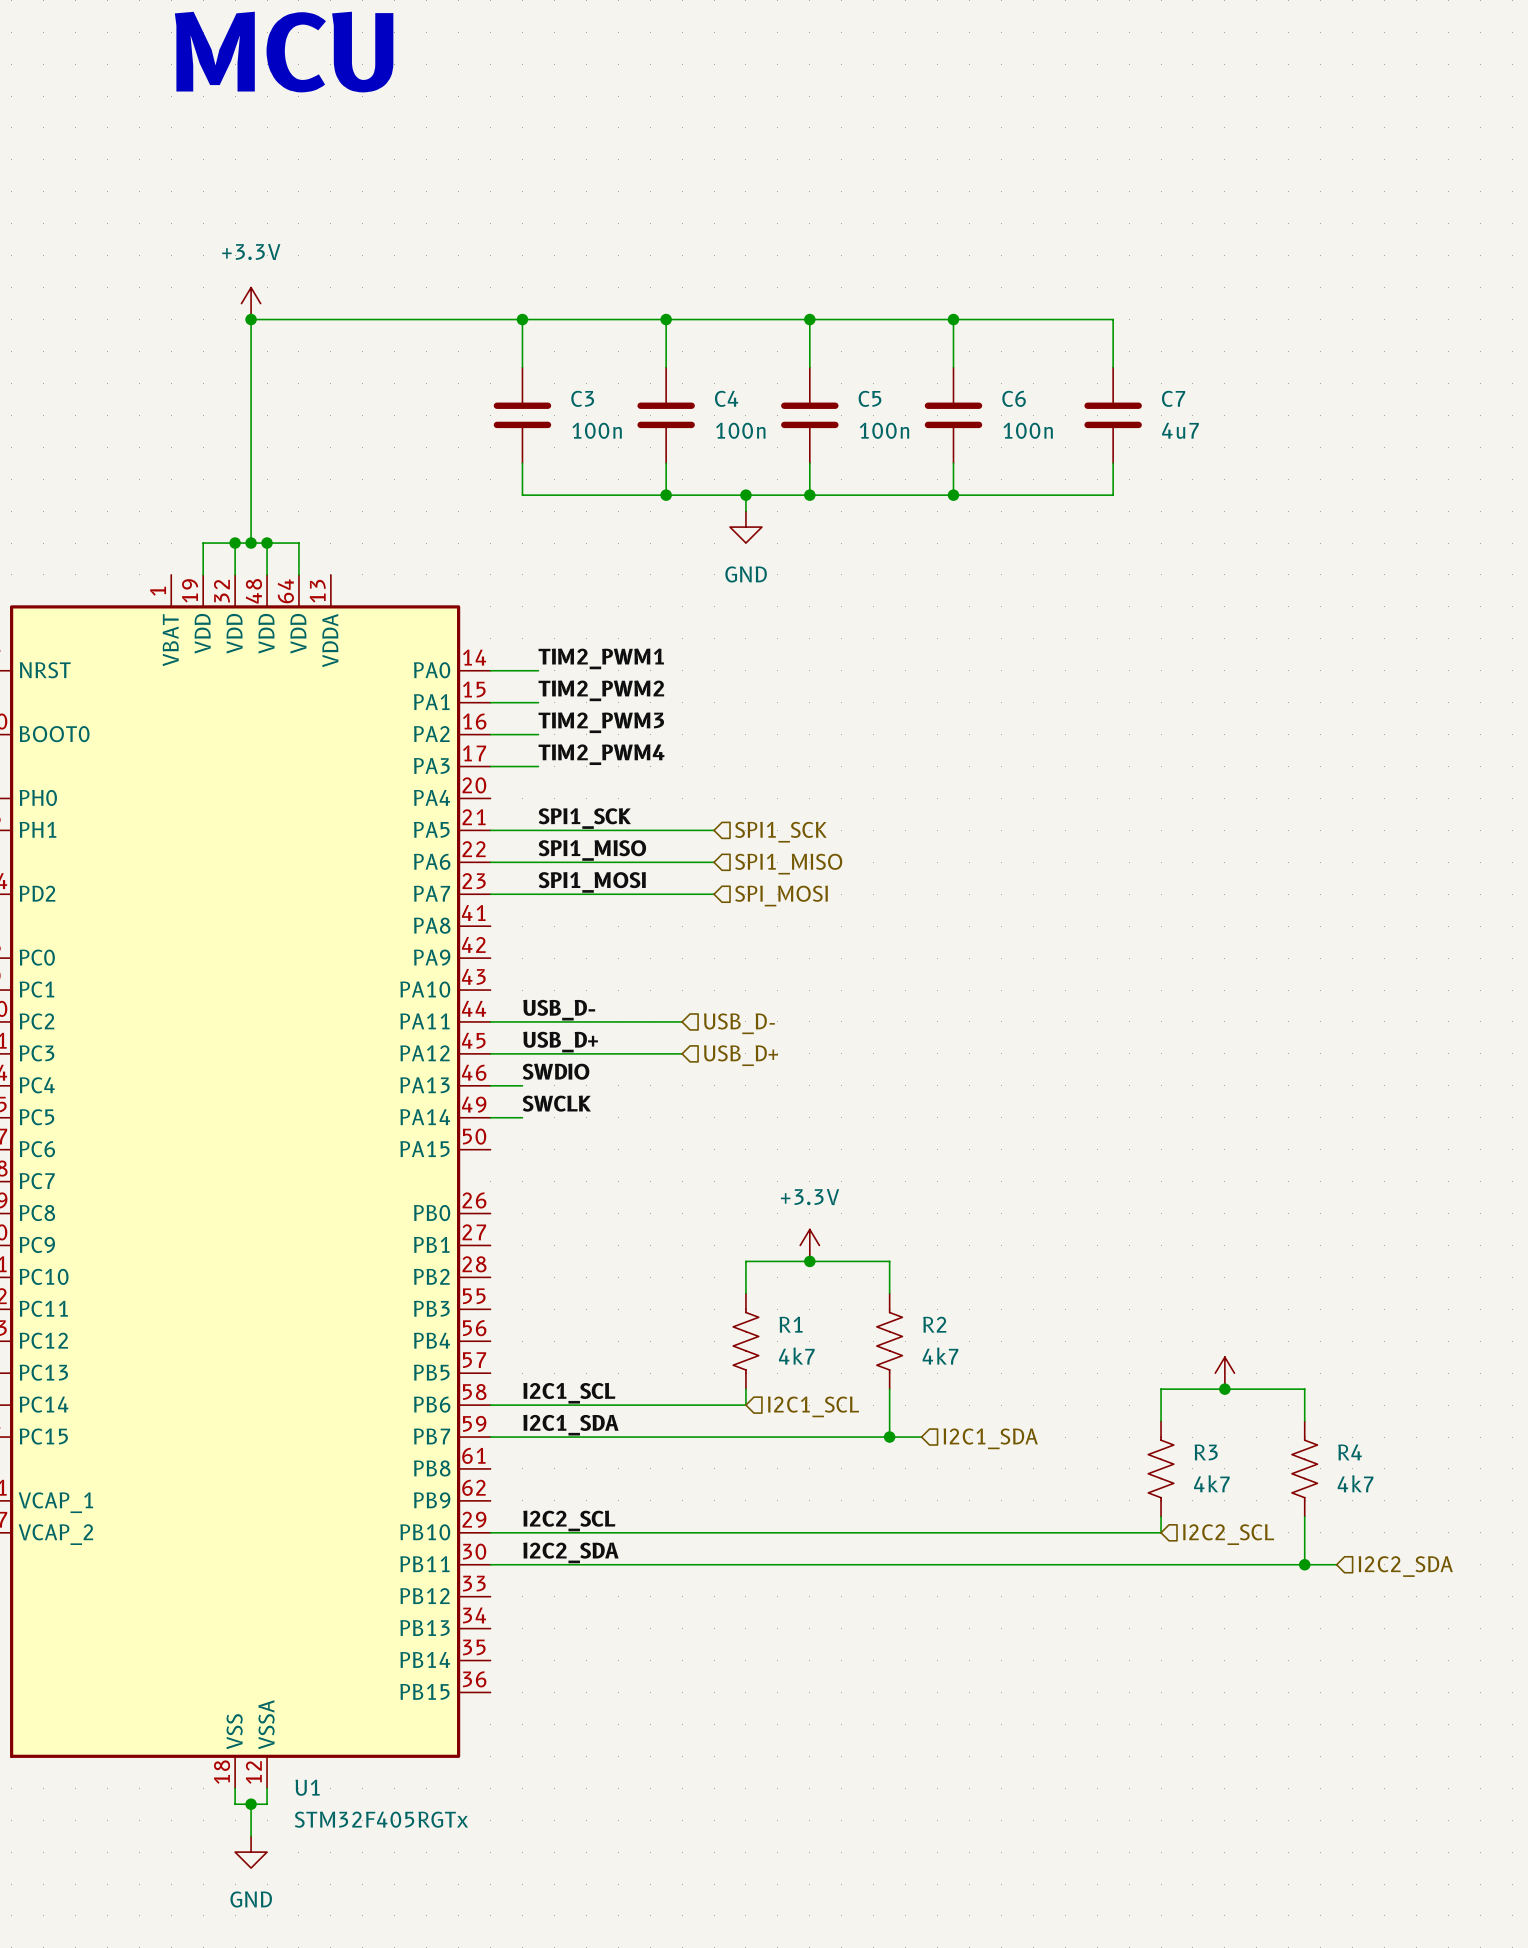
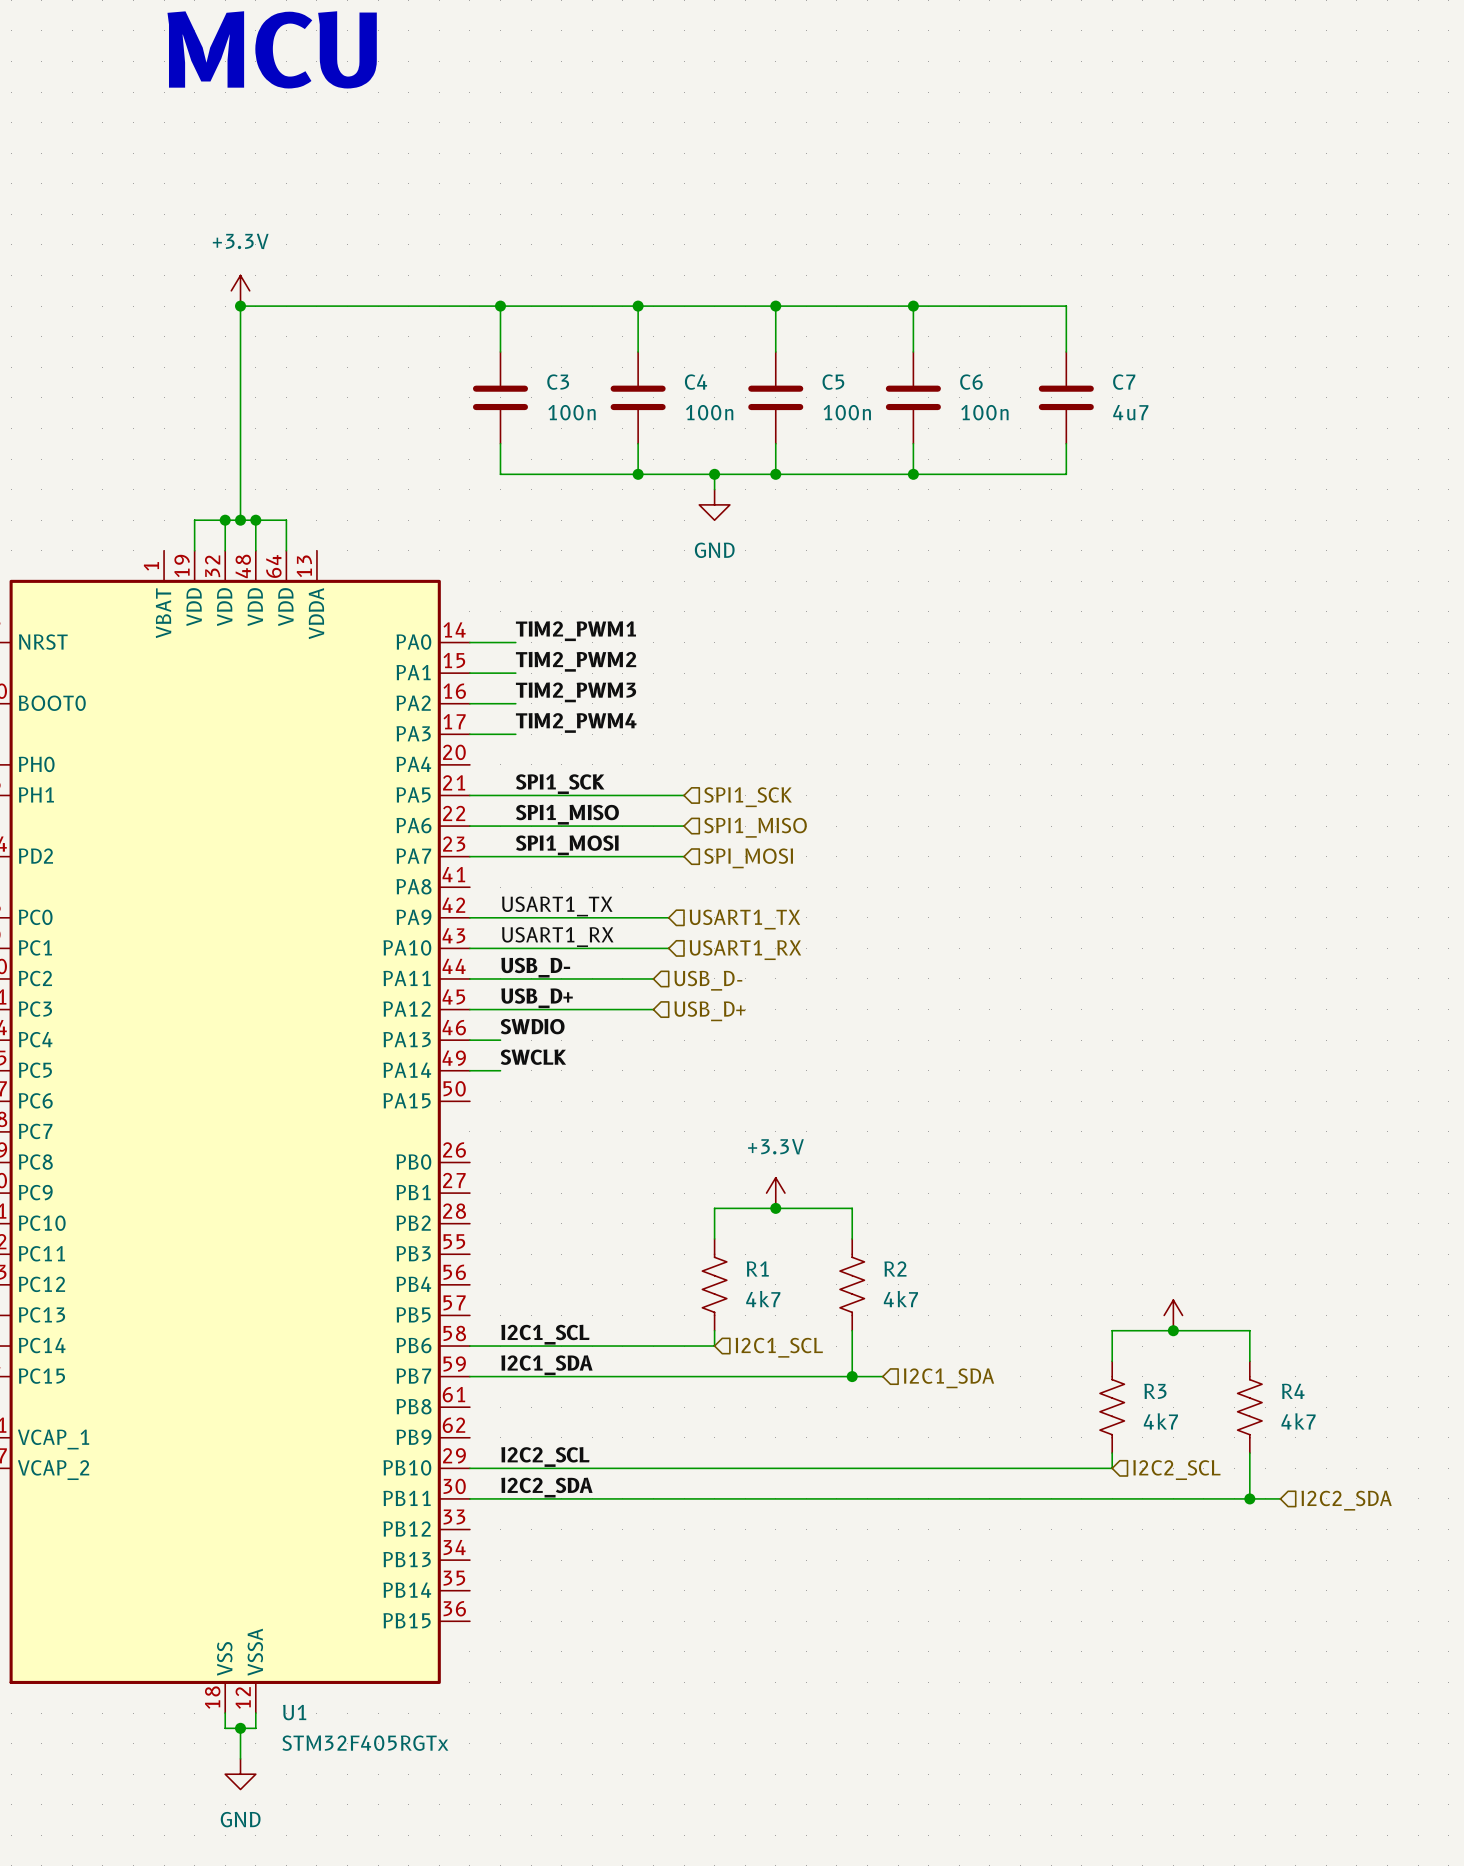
label: none -> USART1_TX (557, 906)
wire: none -> (469, 917) (668, 917)
hierarchical label: none -> USART1_TX (744, 919)
label: none -> USART1_RX (557, 937)
wire: none -> (469, 948) (668, 948)
hierarchical label: none -> USART1_RX (745, 950)

